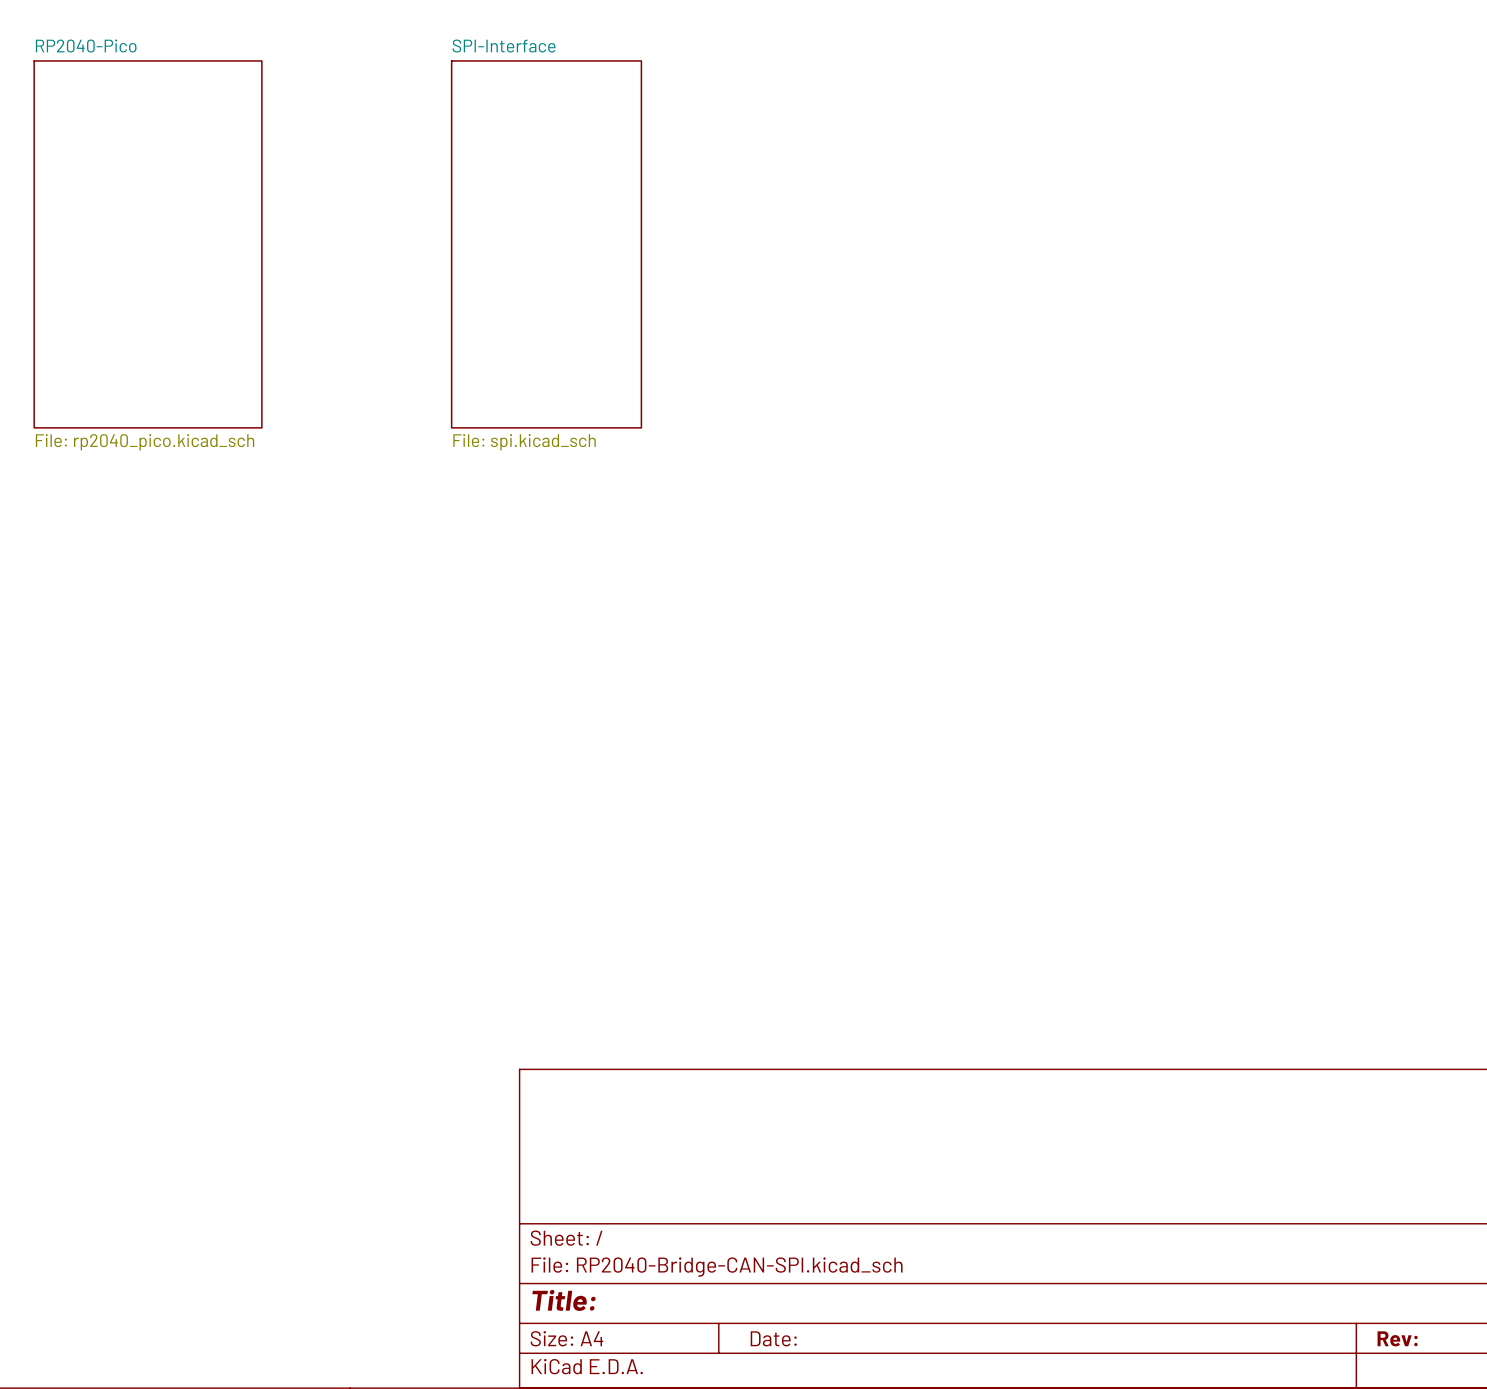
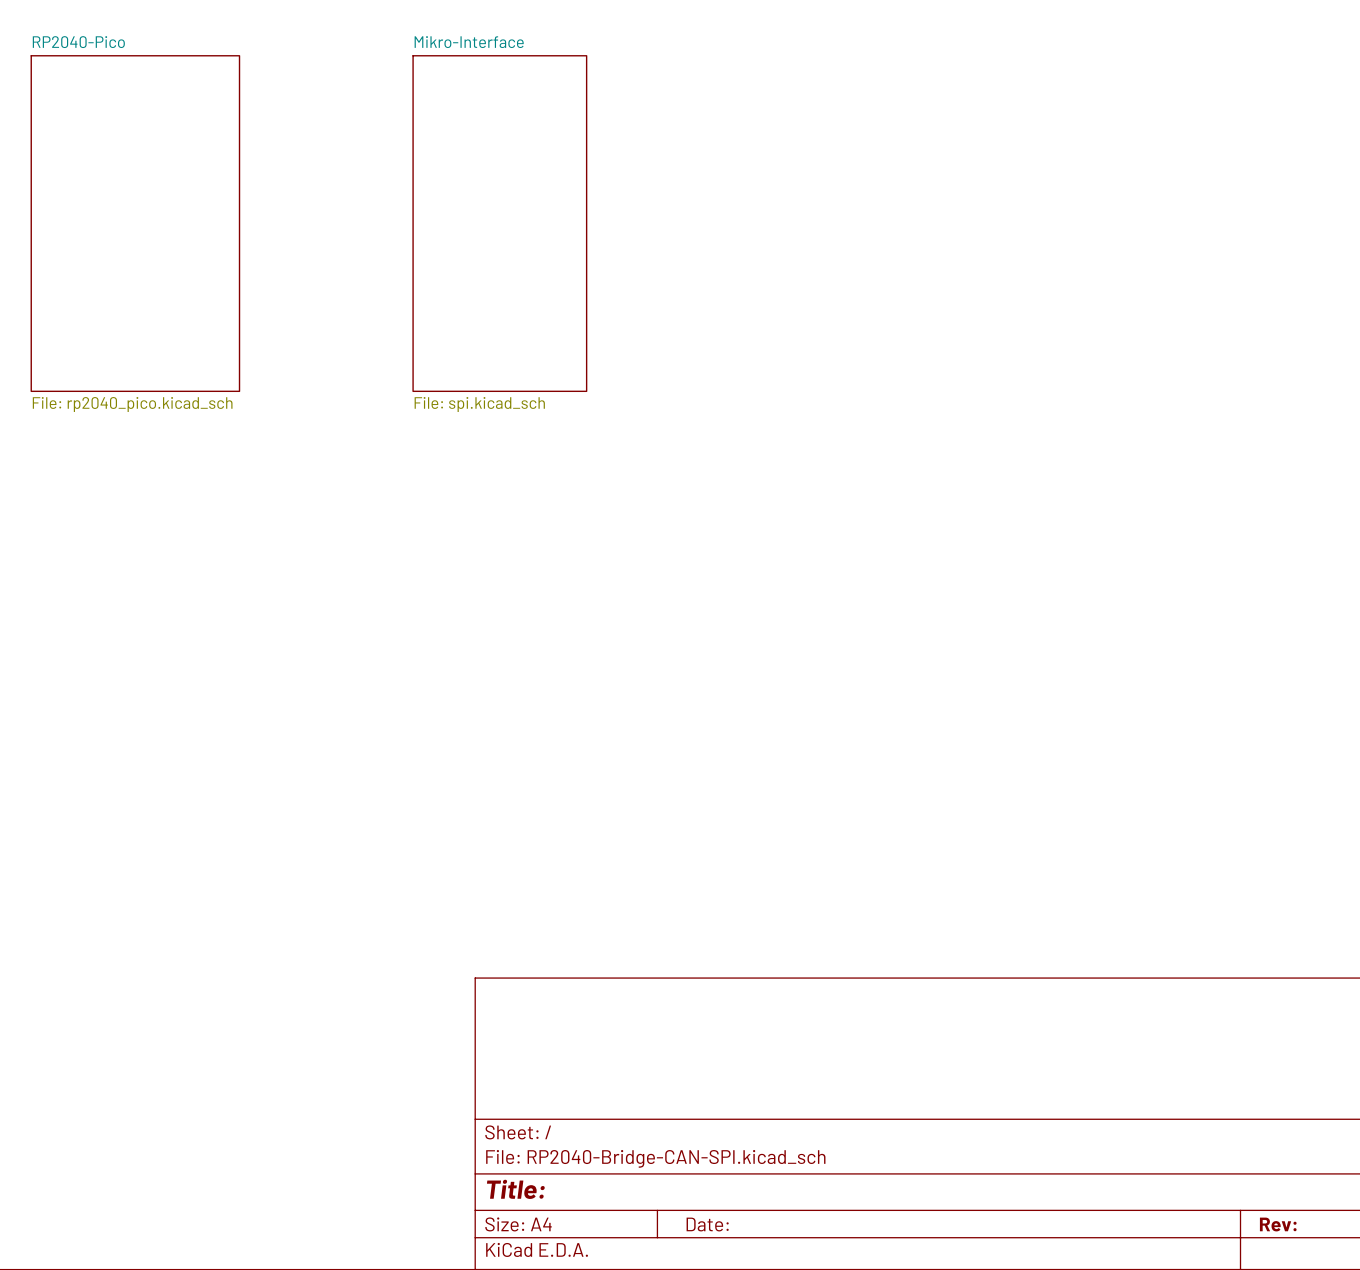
sheet SPI-Interface name: SPI-Interface (504, 46) -> Mikro-Interface (469, 42)

